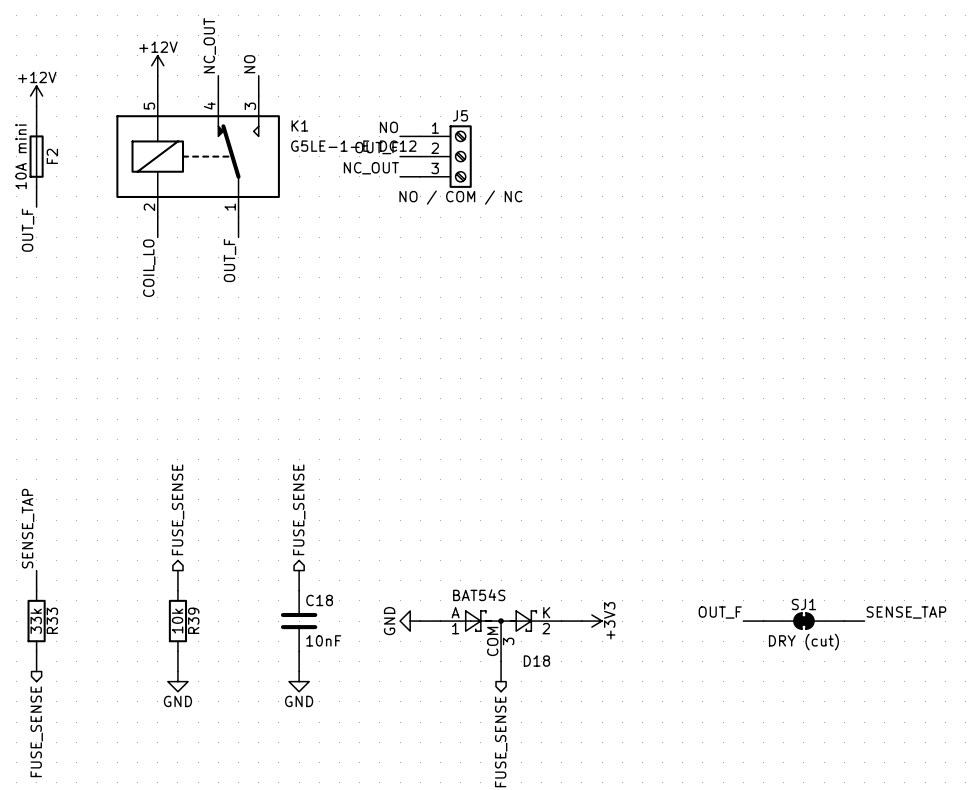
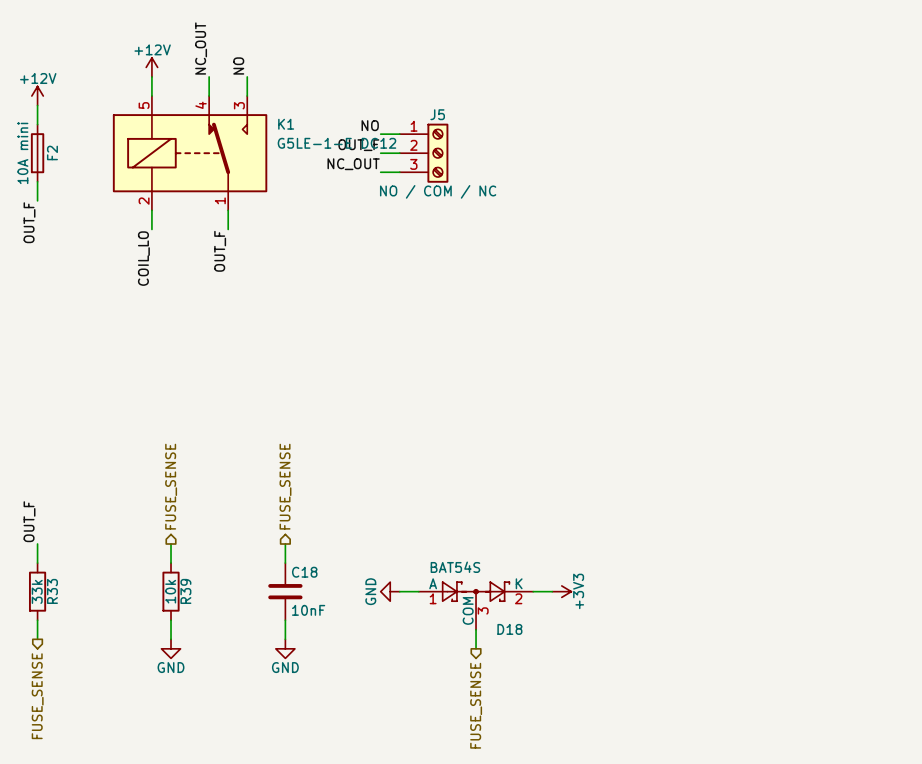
label: SENSE_TAP (28, 528) -> OUT_F (29, 521)
label: OUT_F (720, 612) -> none
label: SENSE_TAP (906, 612) -> none
wire: (743, 621) (763, 621) -> none
SJ1: DRY (cut) (803, 621) -> none
wire: (844, 621) (864, 621) -> none

